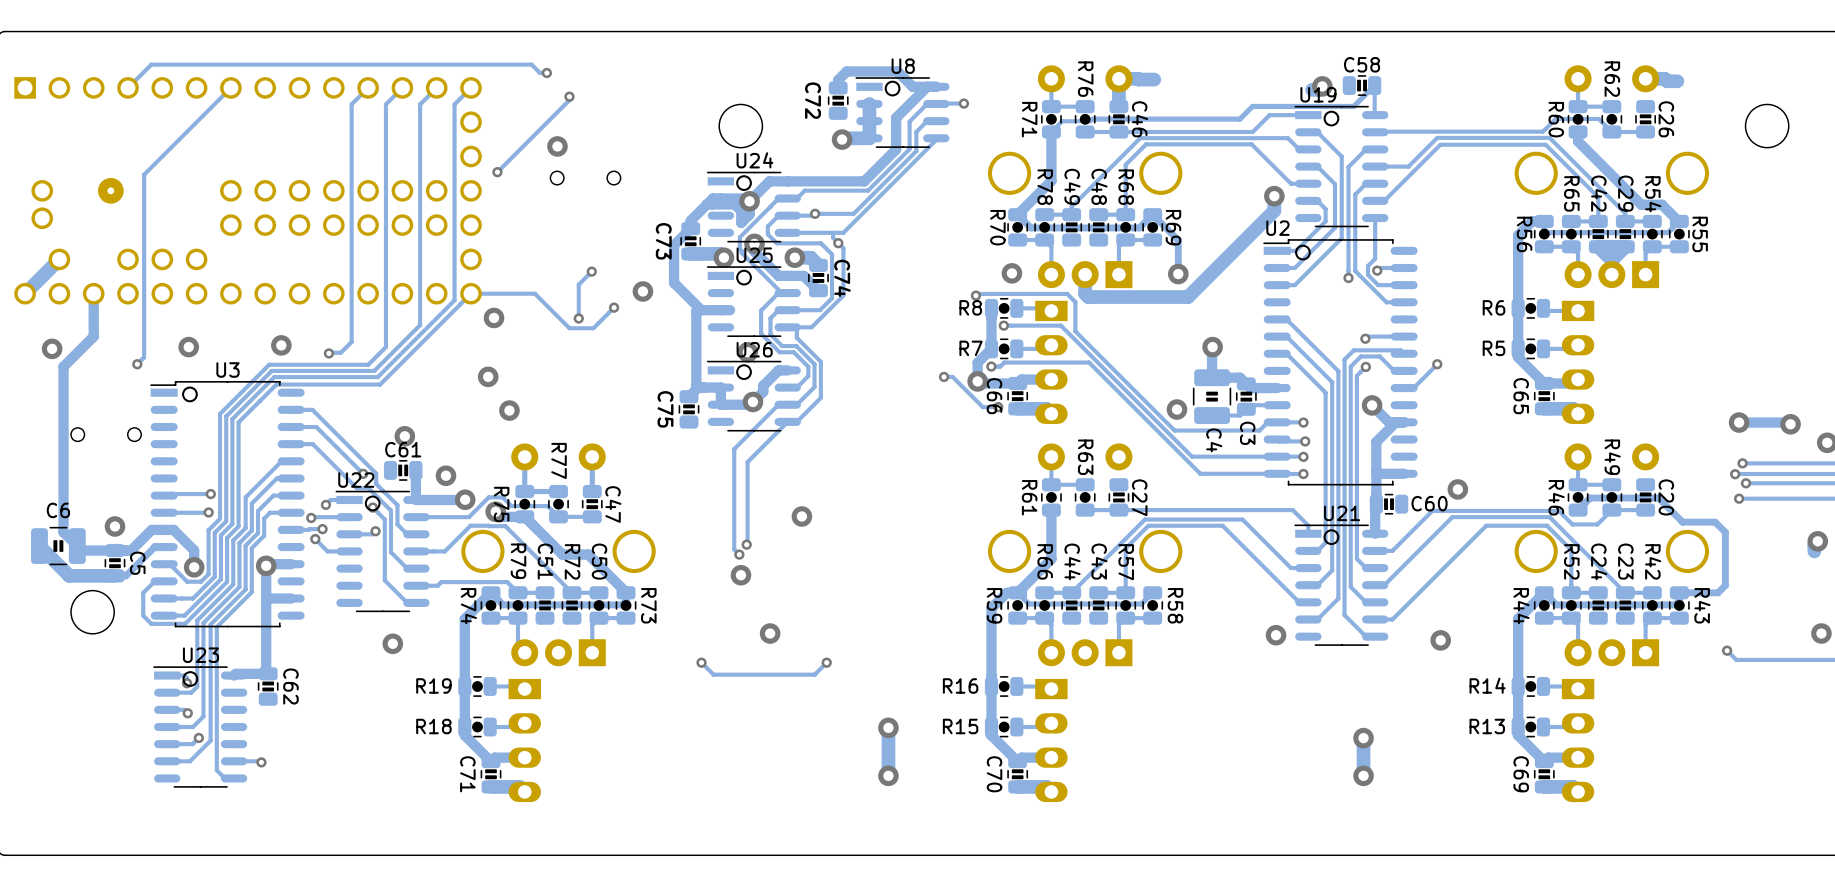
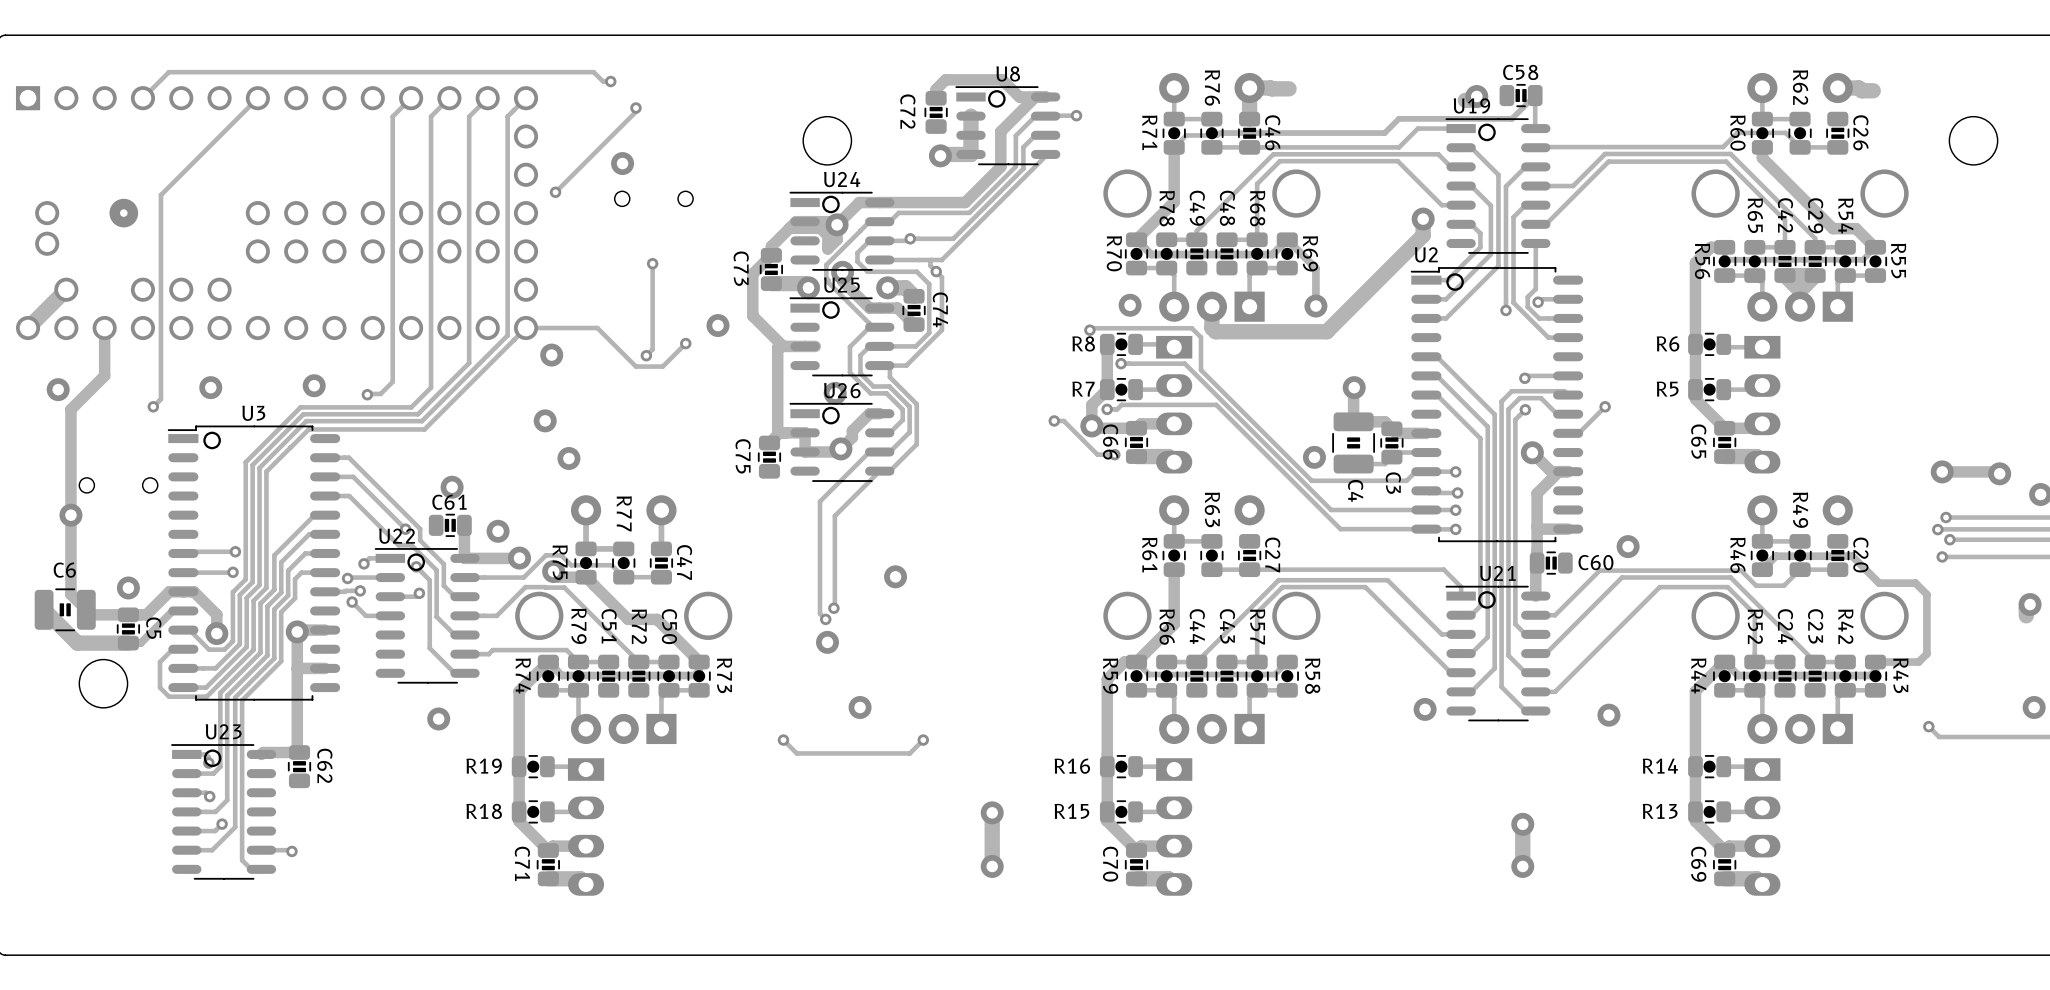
track: (591, 271) (578, 284) (578, 318) -> (652, 263) (652, 349) (646, 355)
via position: (591, 271) -> (652, 263)
via: none -> (70, 515)

